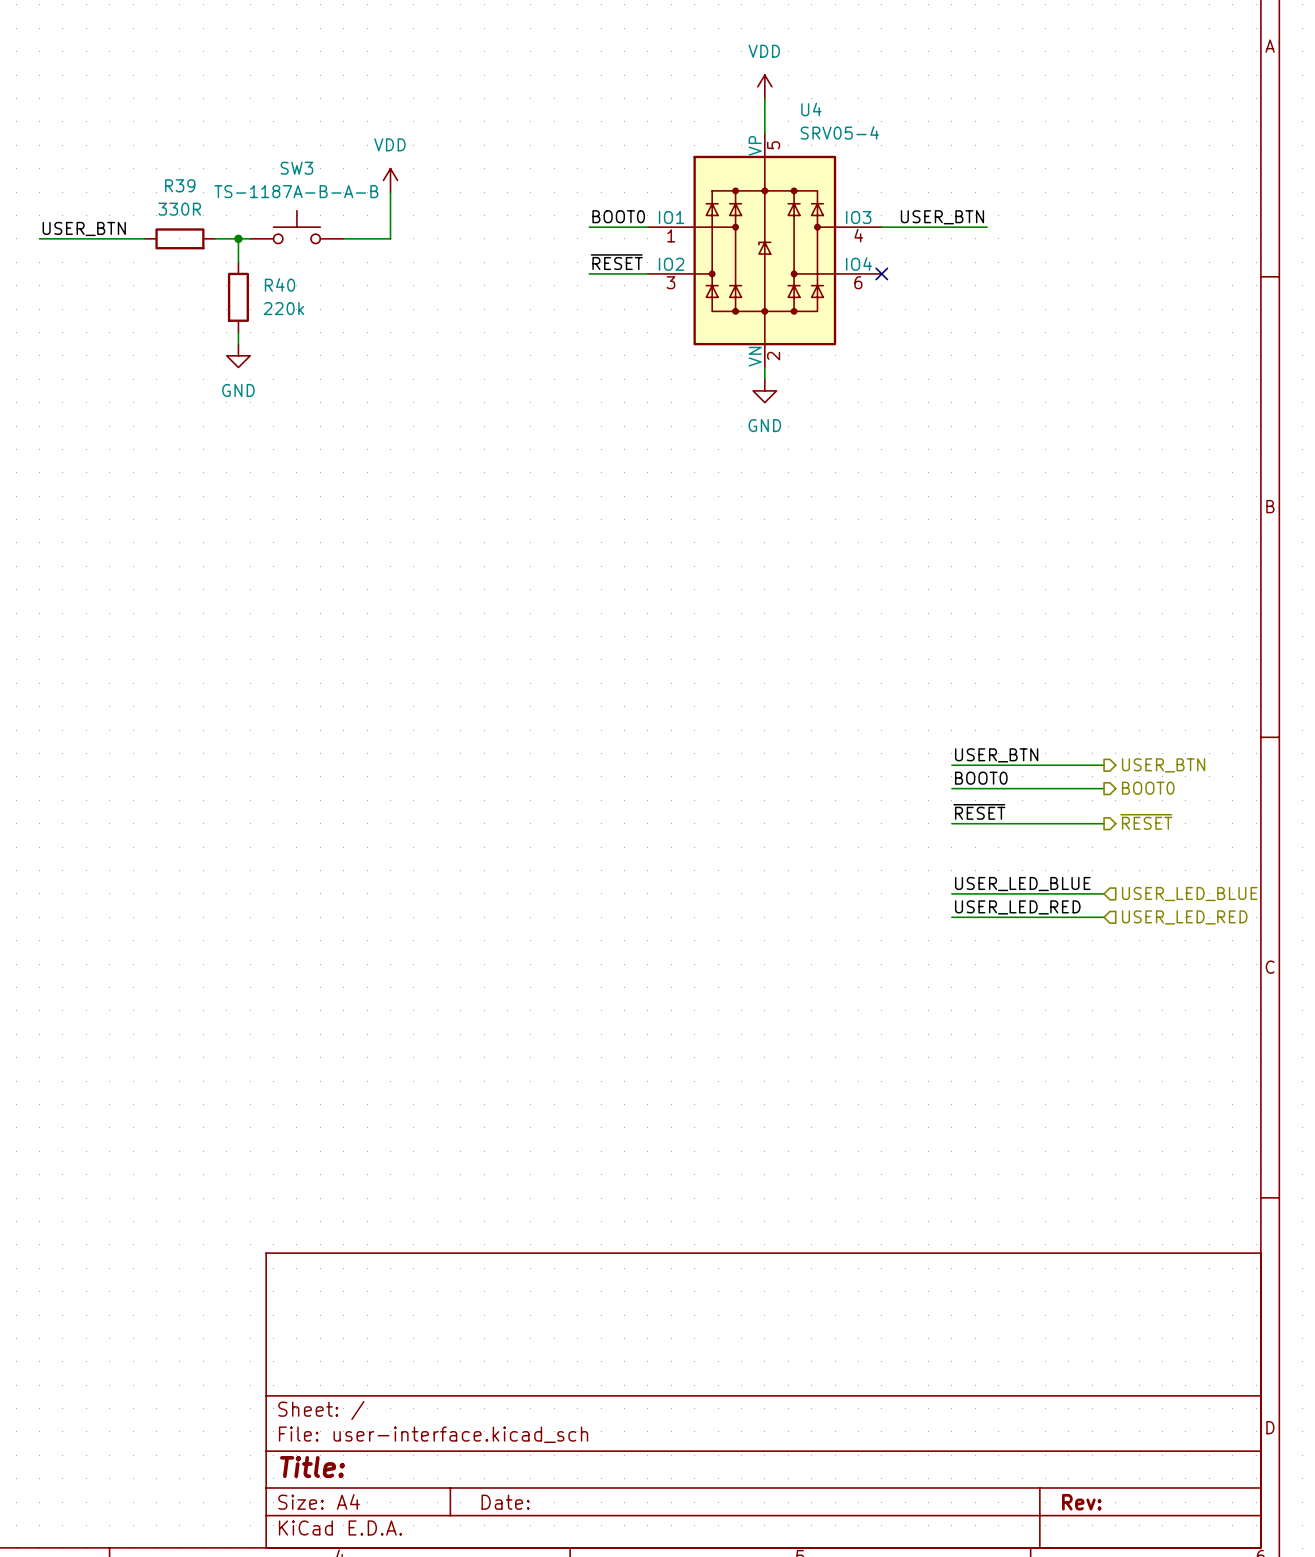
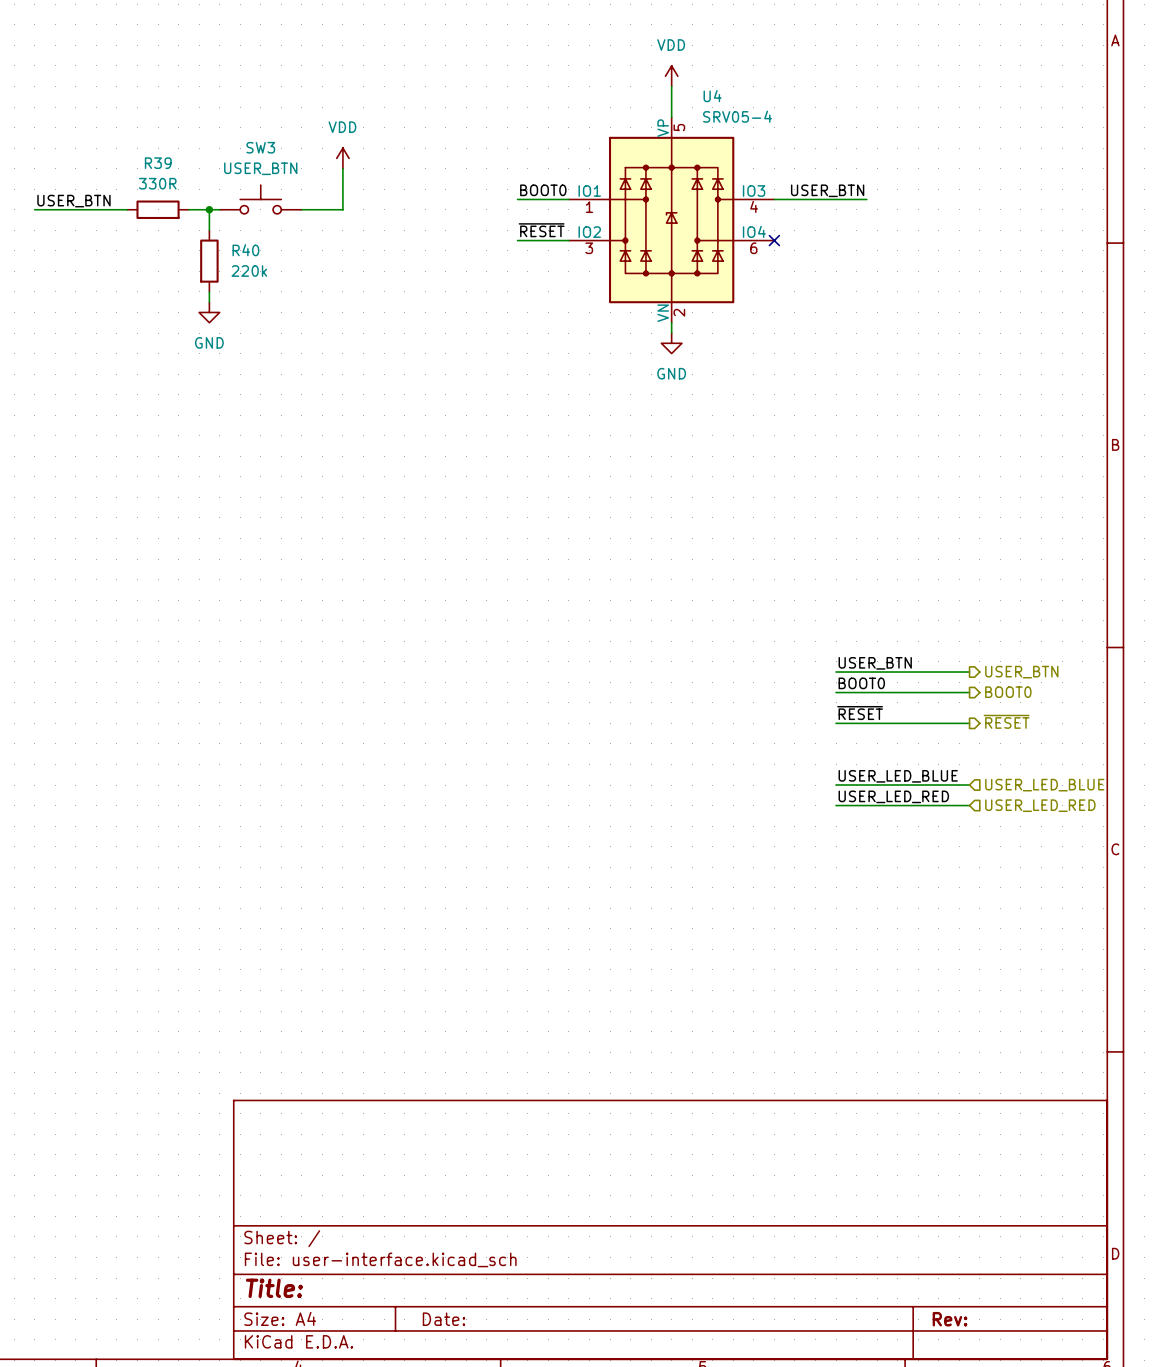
SW3 value: TS-1187A-B-A-B (296, 191) -> USER_BTN (260, 168)

